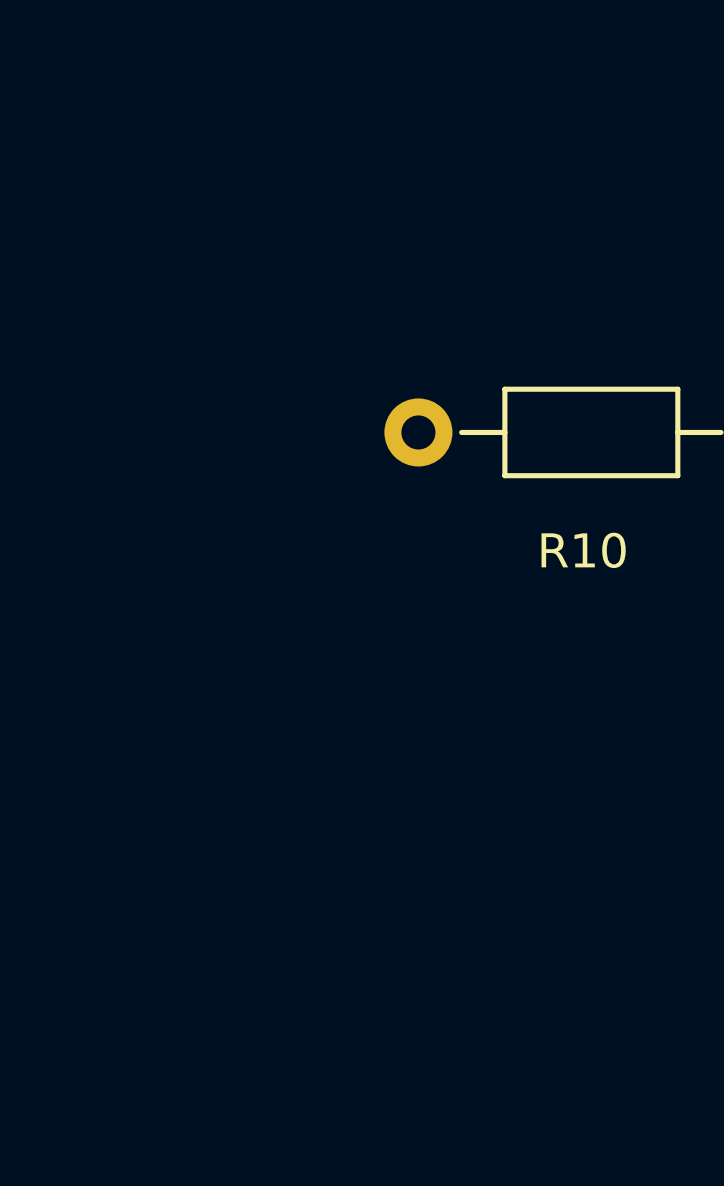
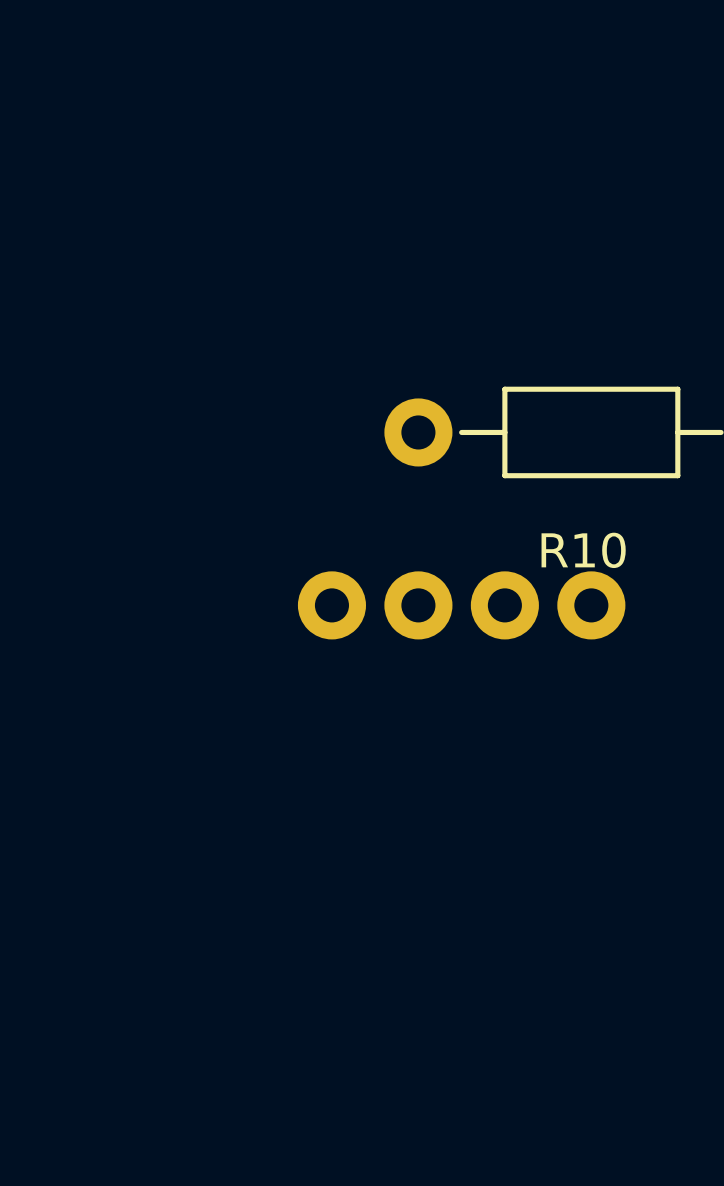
part: none -> (375, 605)
part: none -> (548, 605)

